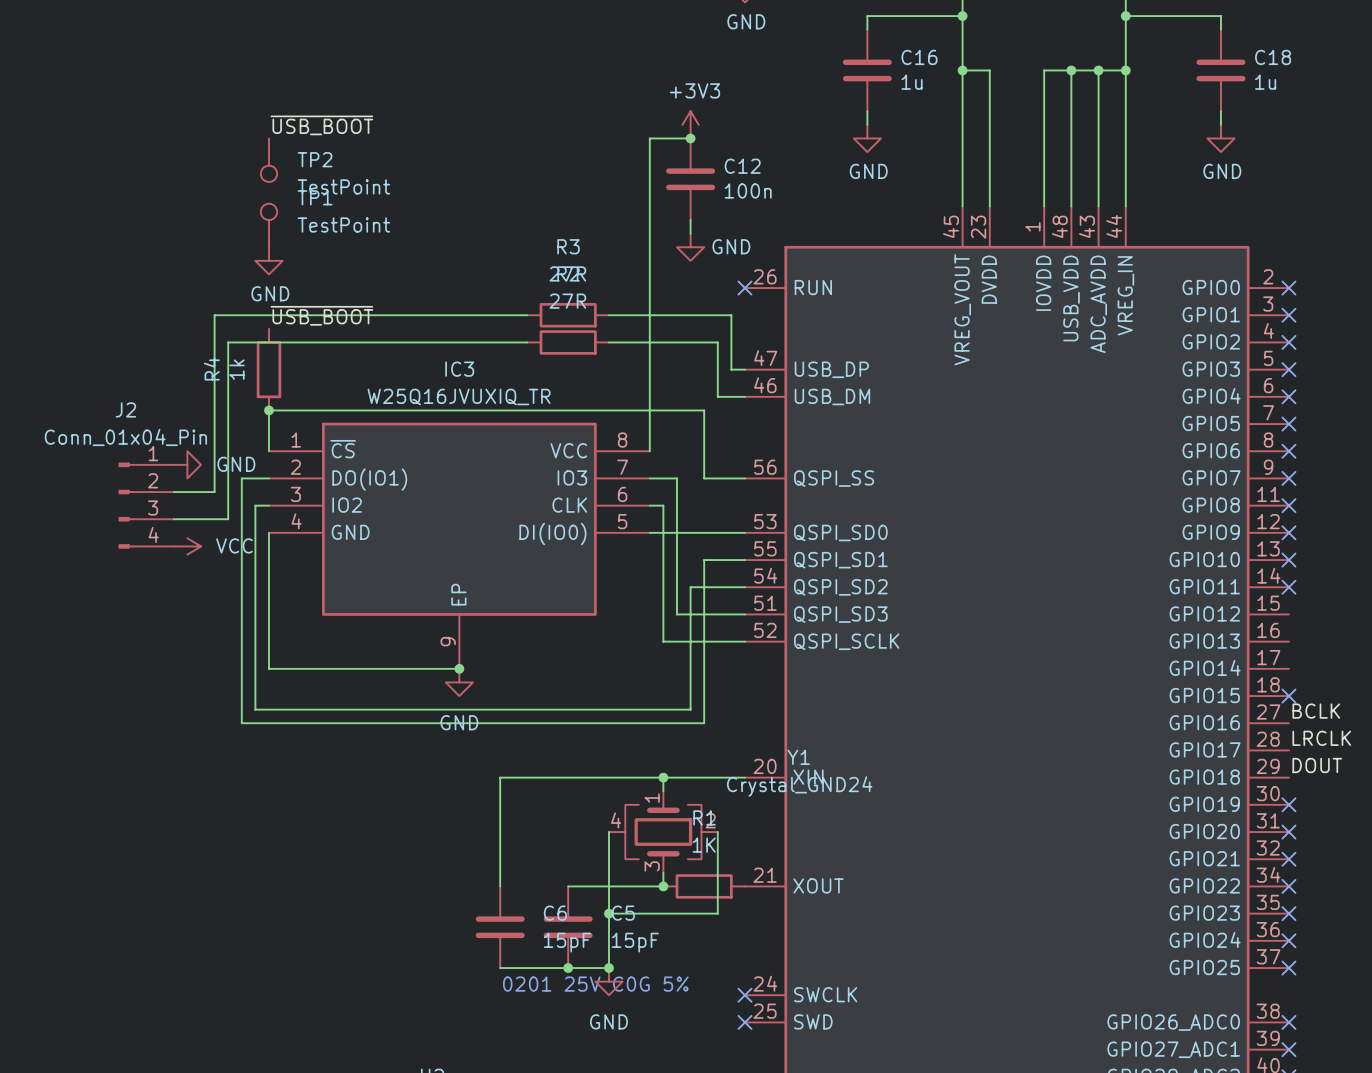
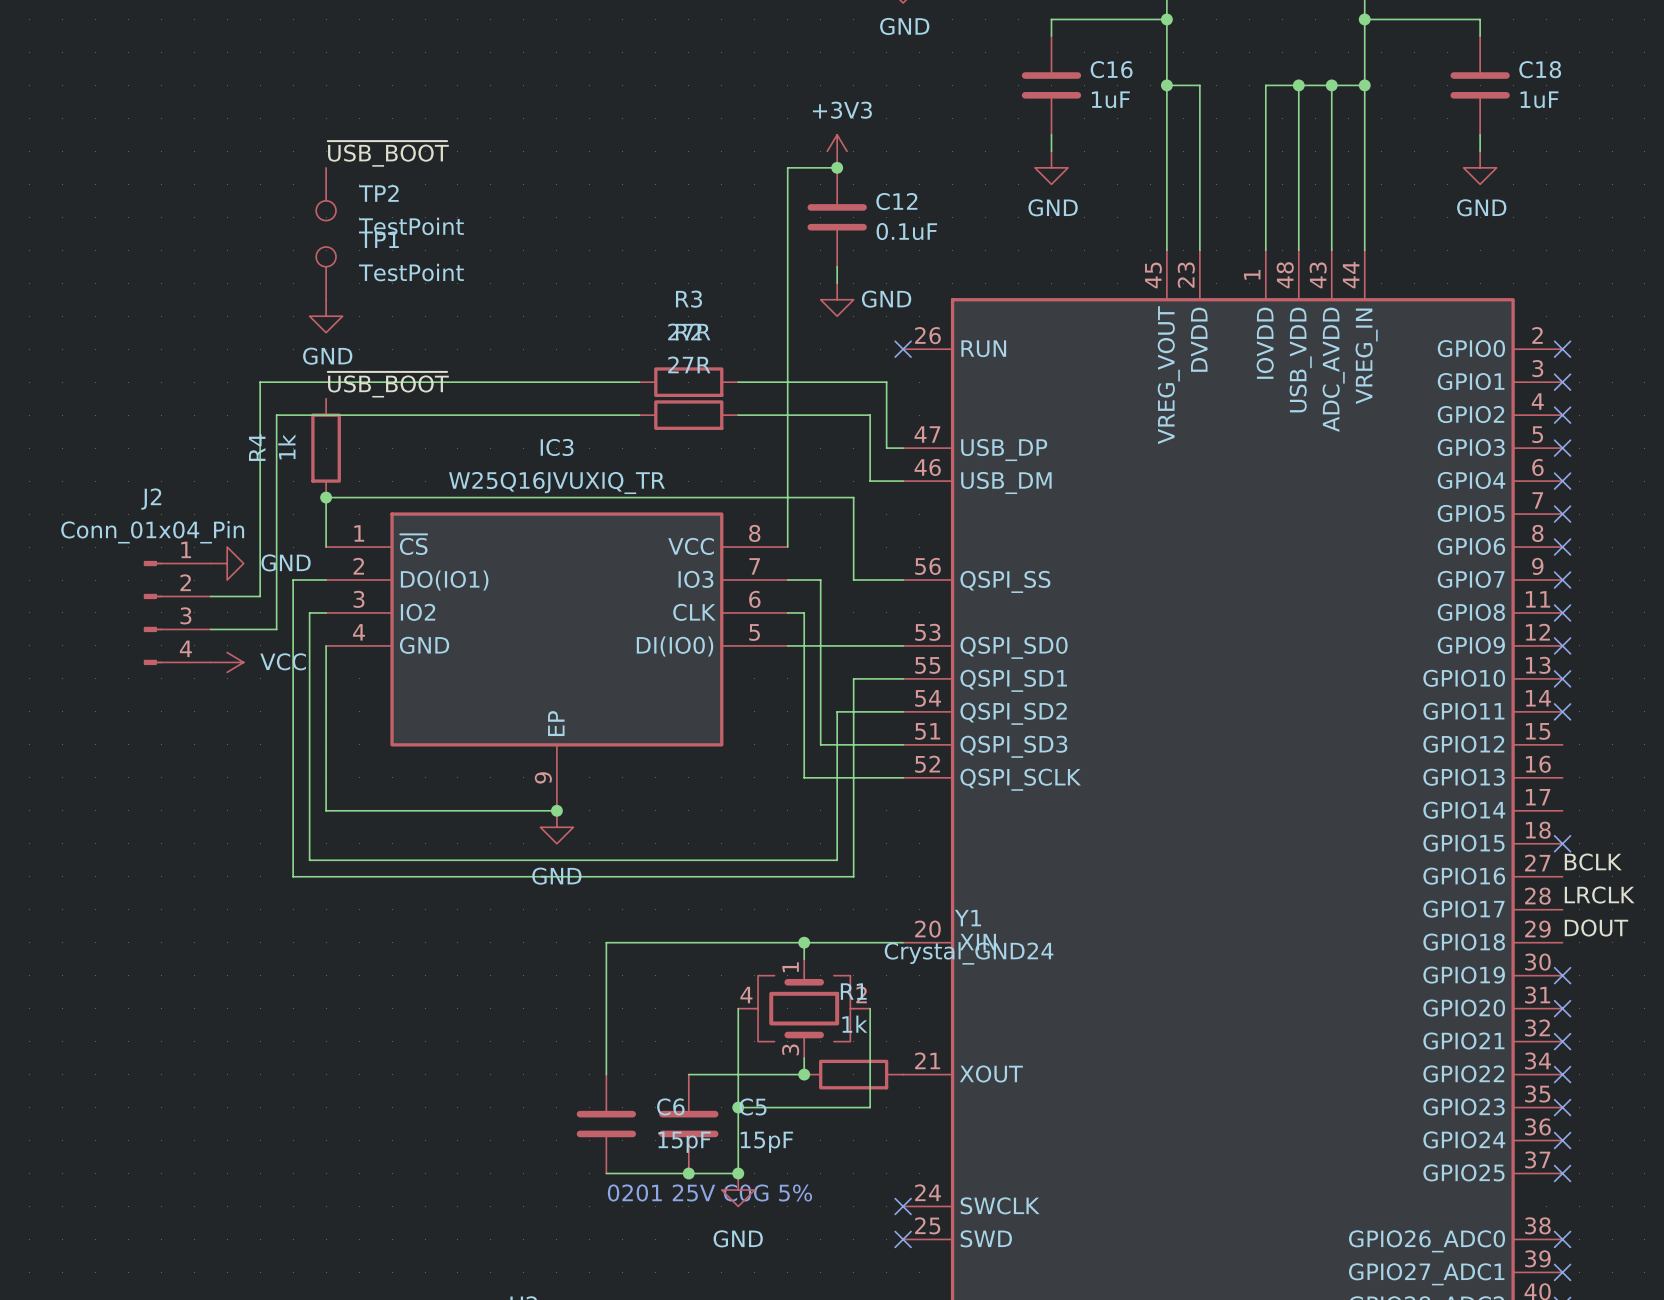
C16 value: 1u (912, 82) -> 1uF (1110, 99)
C18 value: 1u (1265, 82) -> 1uF (1539, 99)
C12 value: 100n (748, 190) -> 0.1uF (906, 231)
R1 value: 1K (704, 845) -> 1k (854, 1024)

